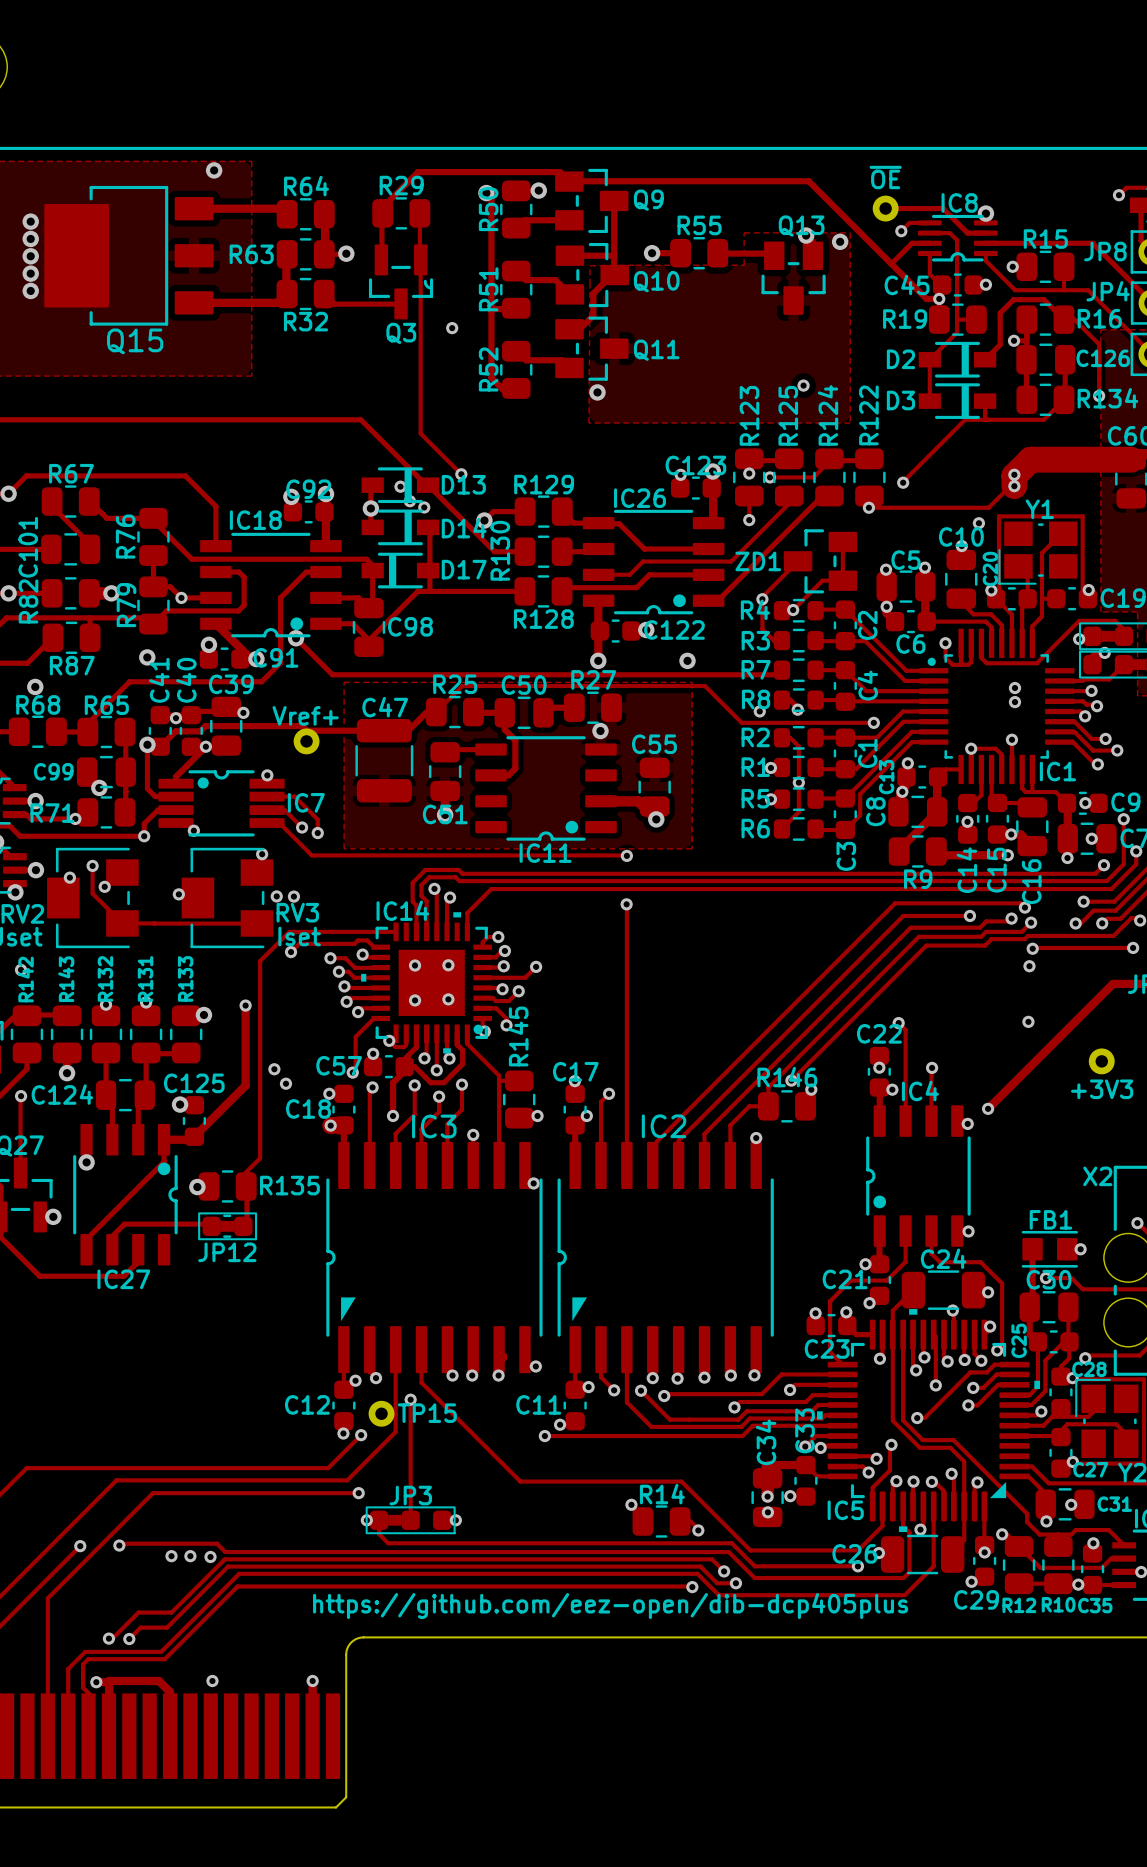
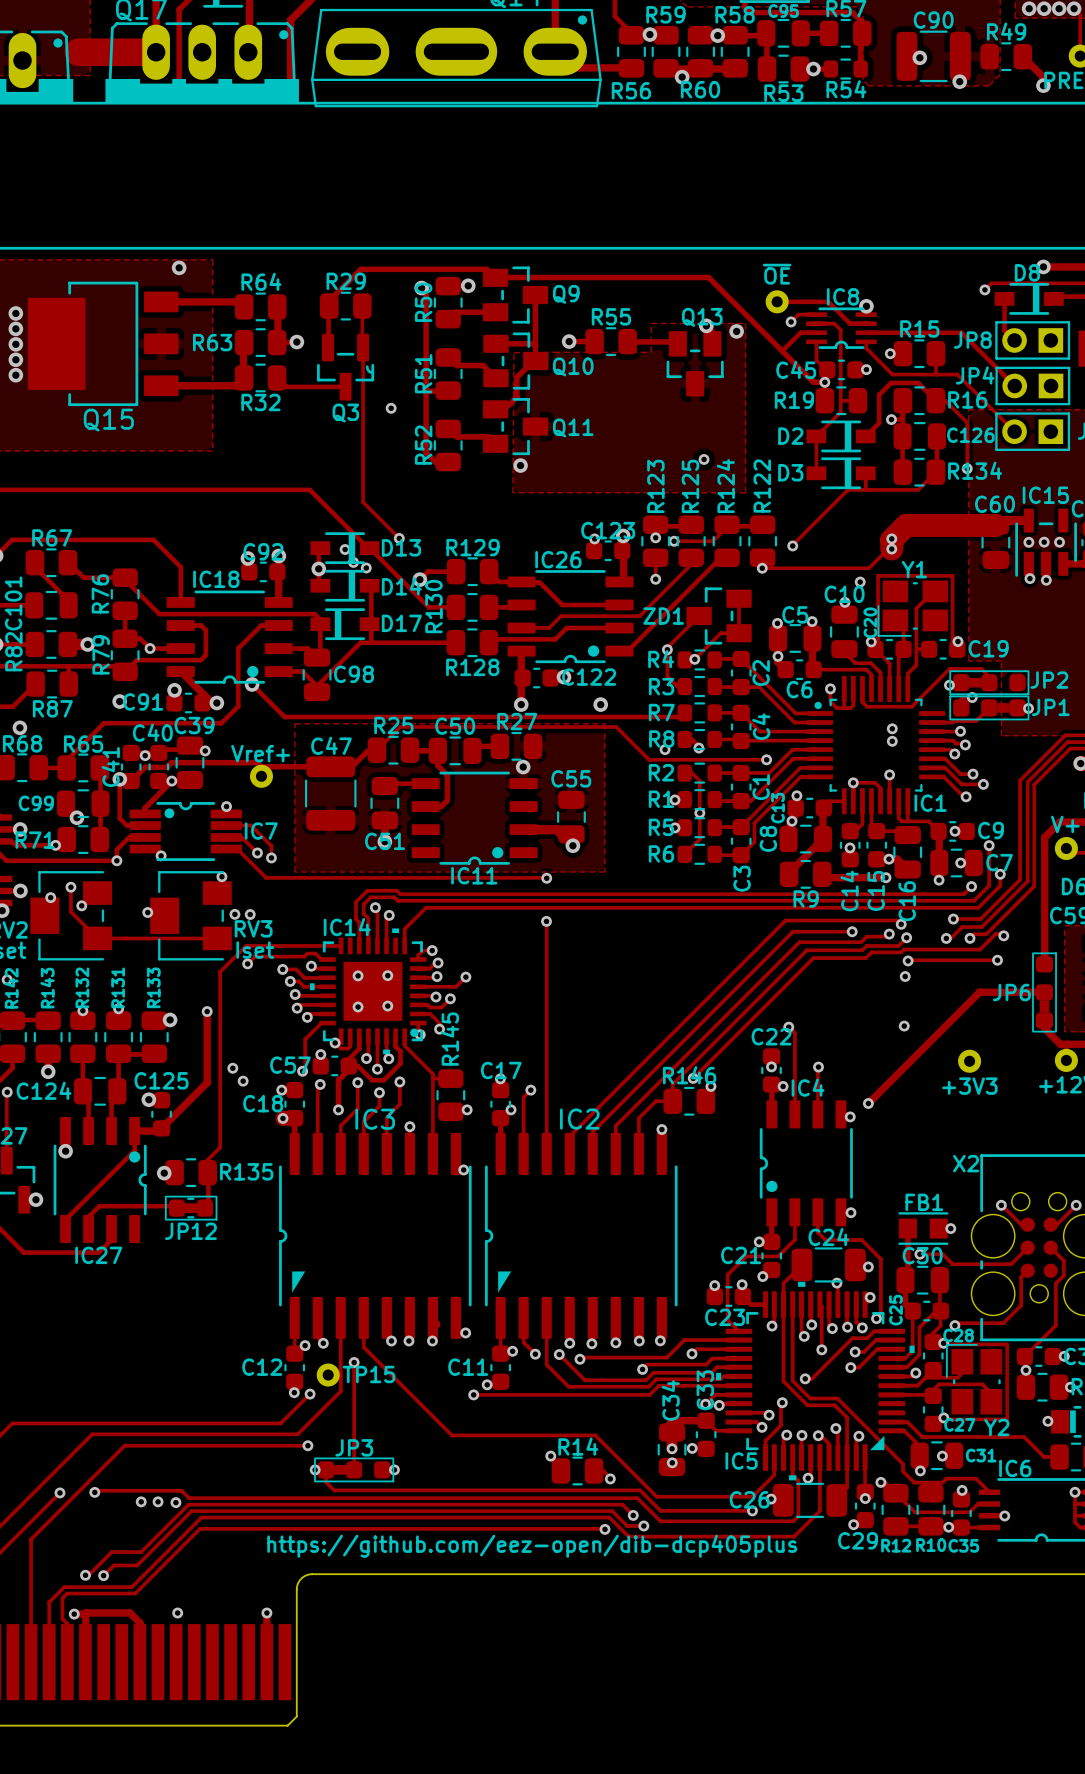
C91 name position: C91 (276, 657) -> C91 (143, 701)
C41 name position: C41 (159, 680) -> C41 (110, 766)
C40 name rotation: 0° (186, 680) -> 90° clockwise (152, 732)

